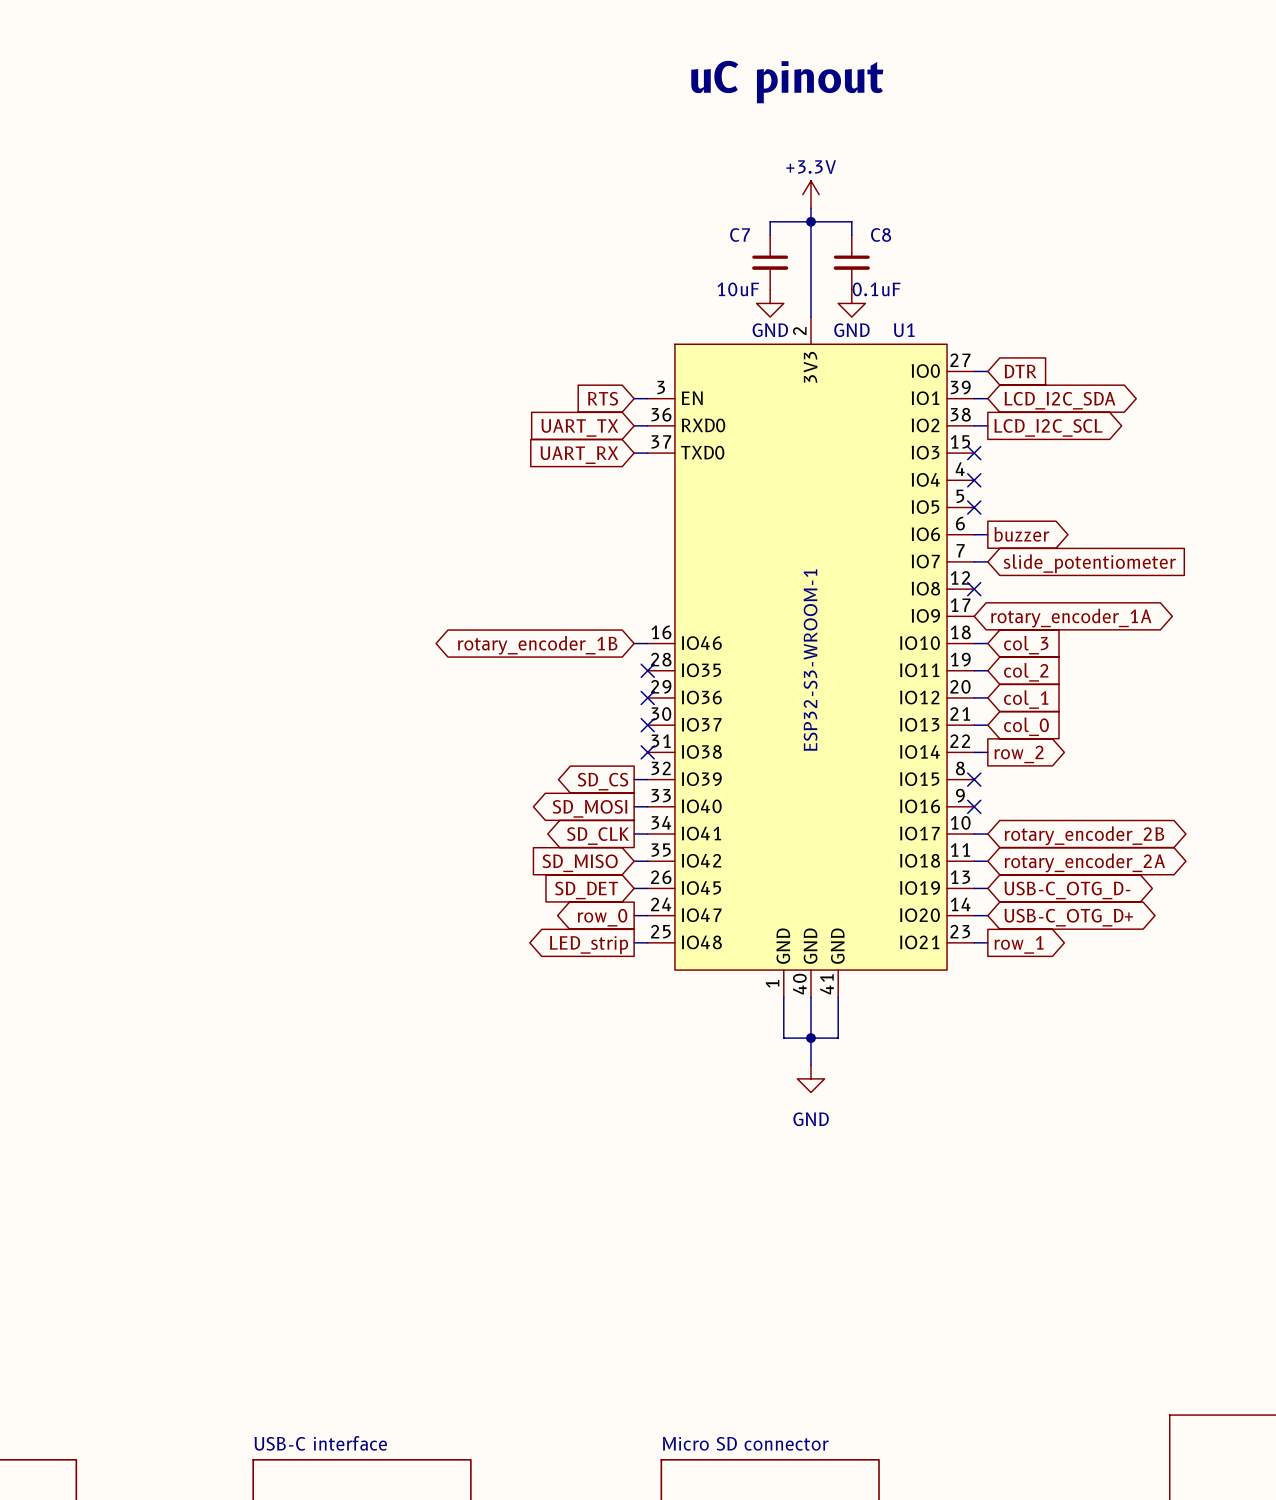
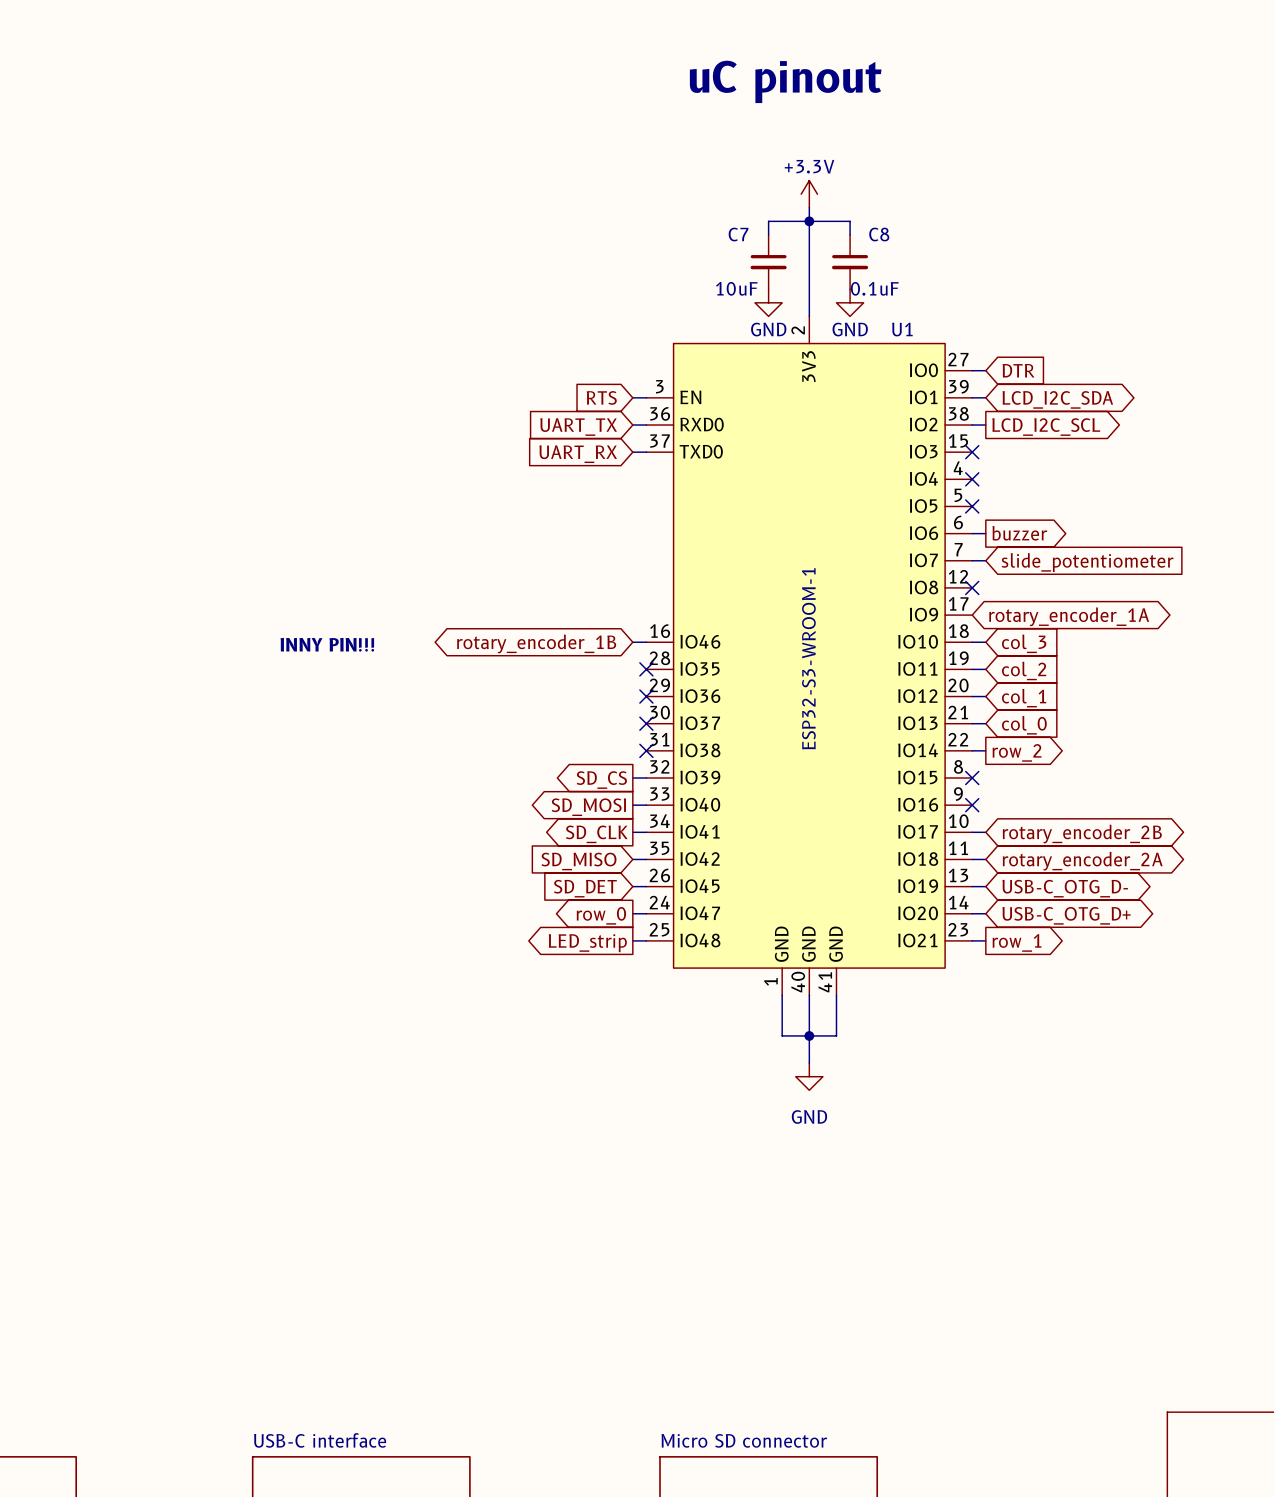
text: none -> INNY PIN!!! (327, 644)

